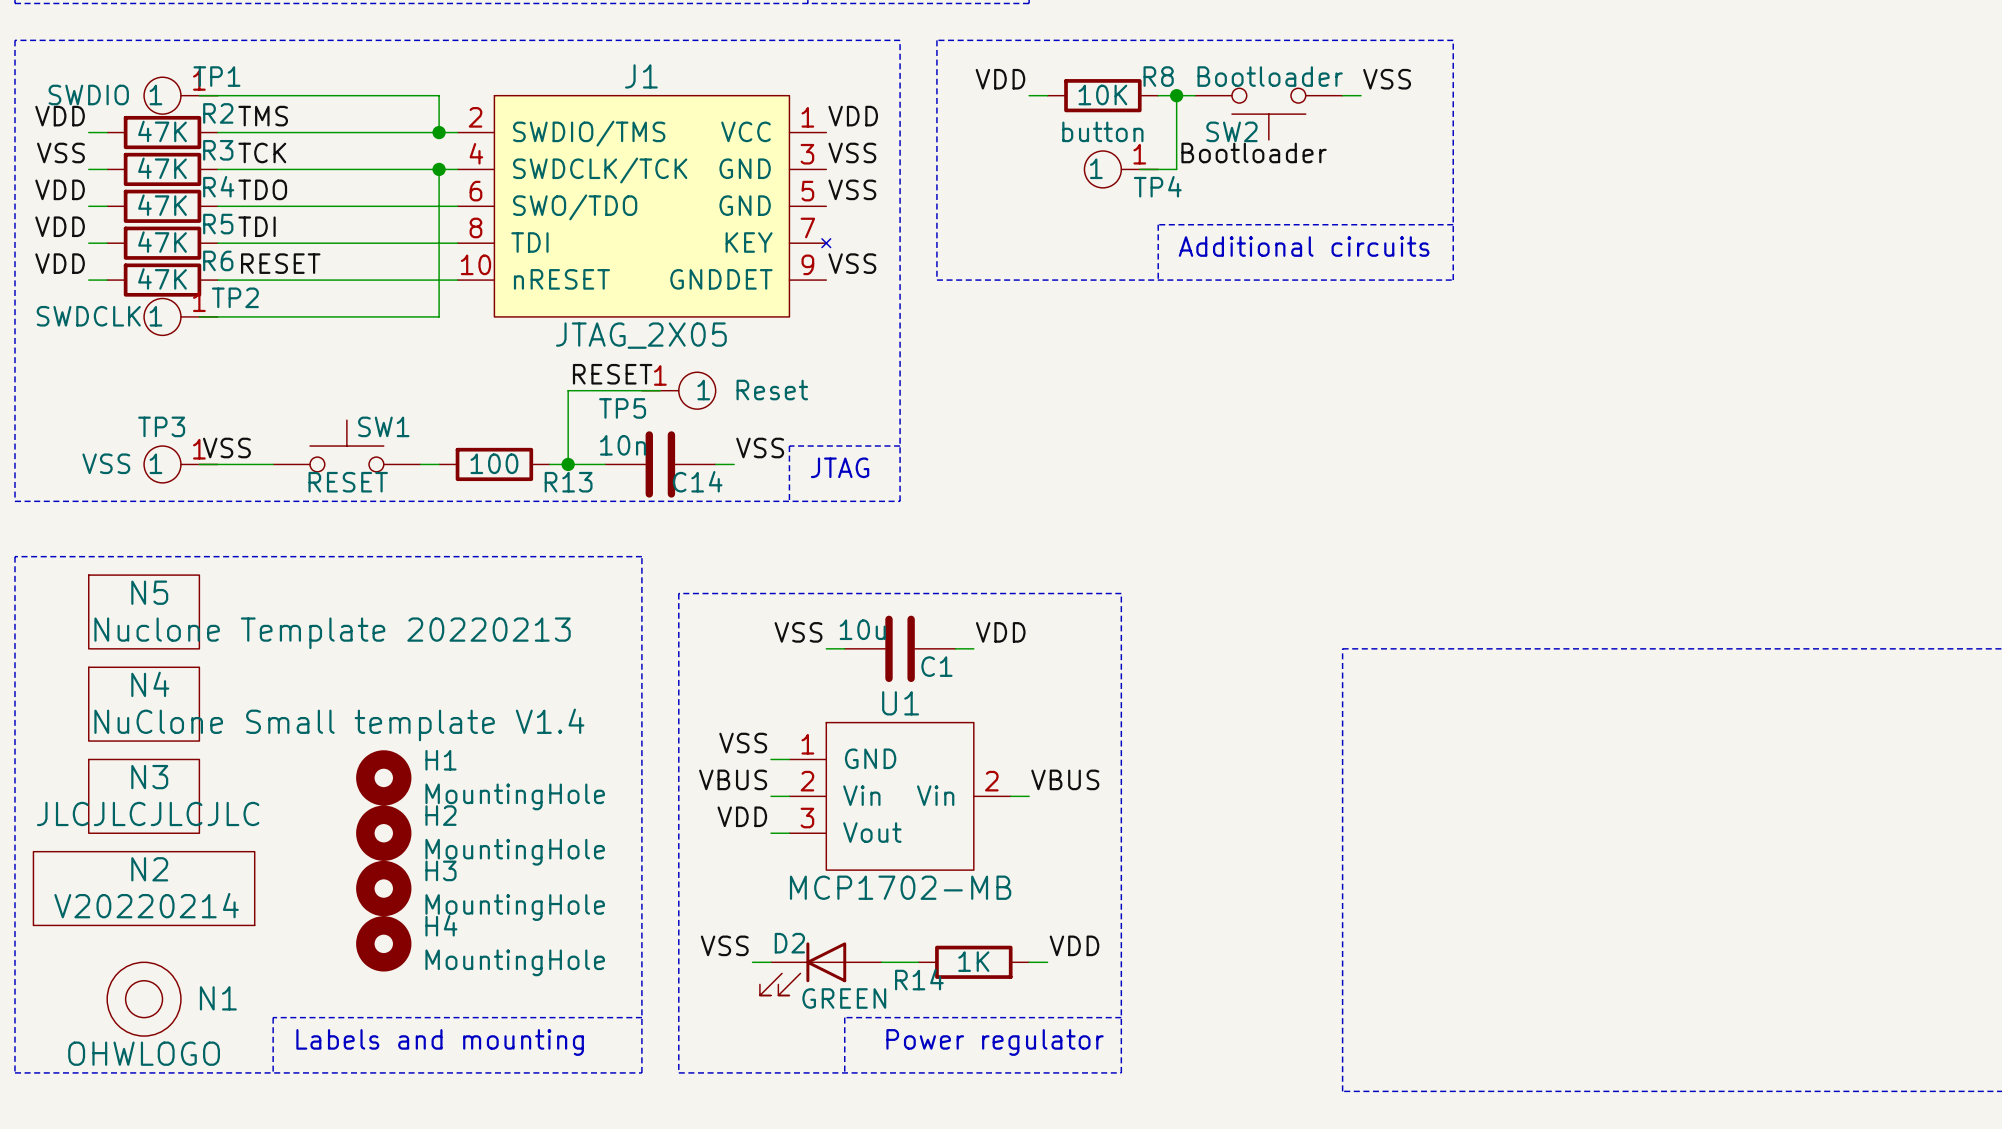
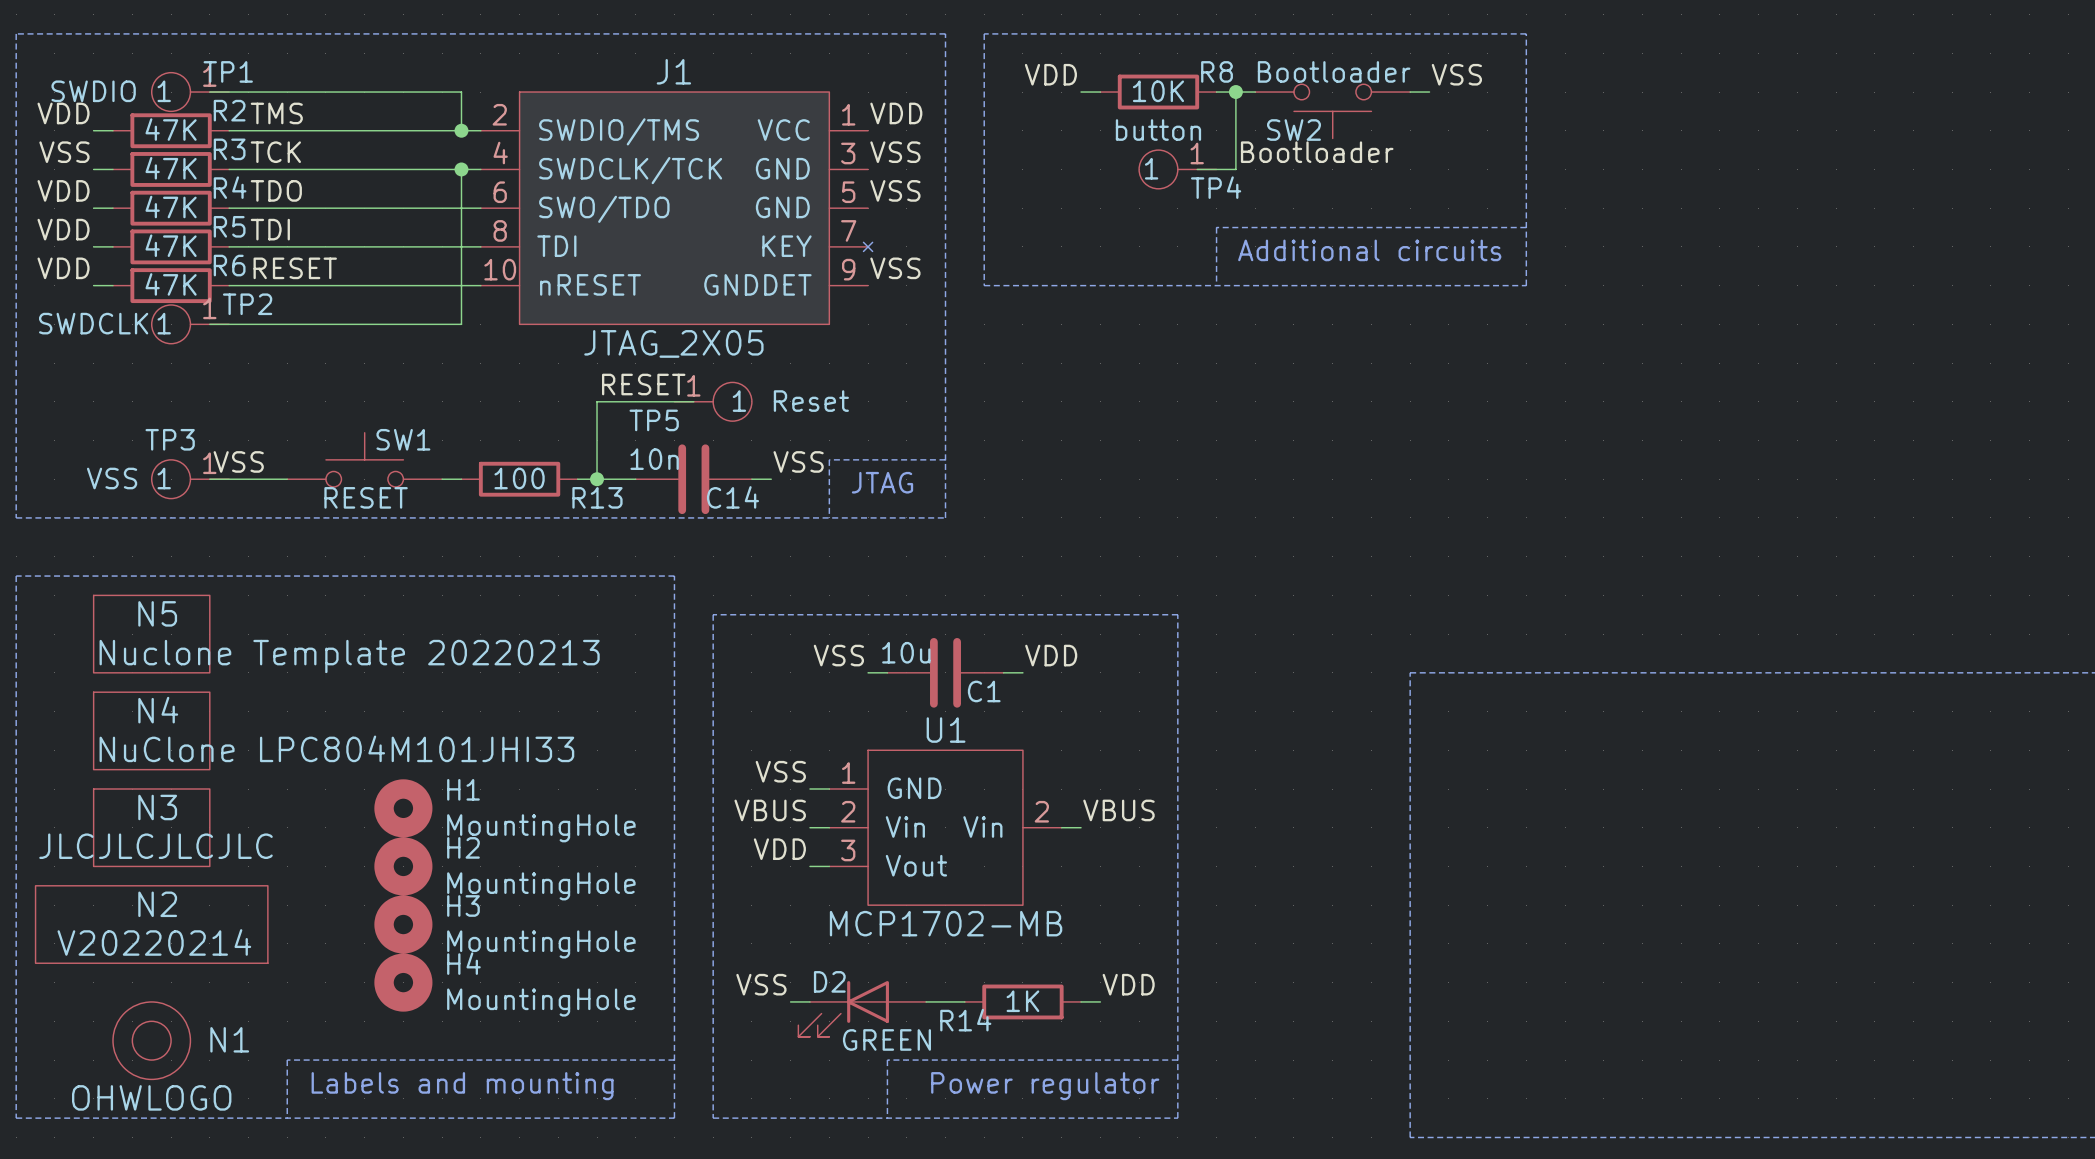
N4 value: NuClone Small template V1.4 (339, 724) -> NuClone LPC804M101JHI33 (336, 748)

